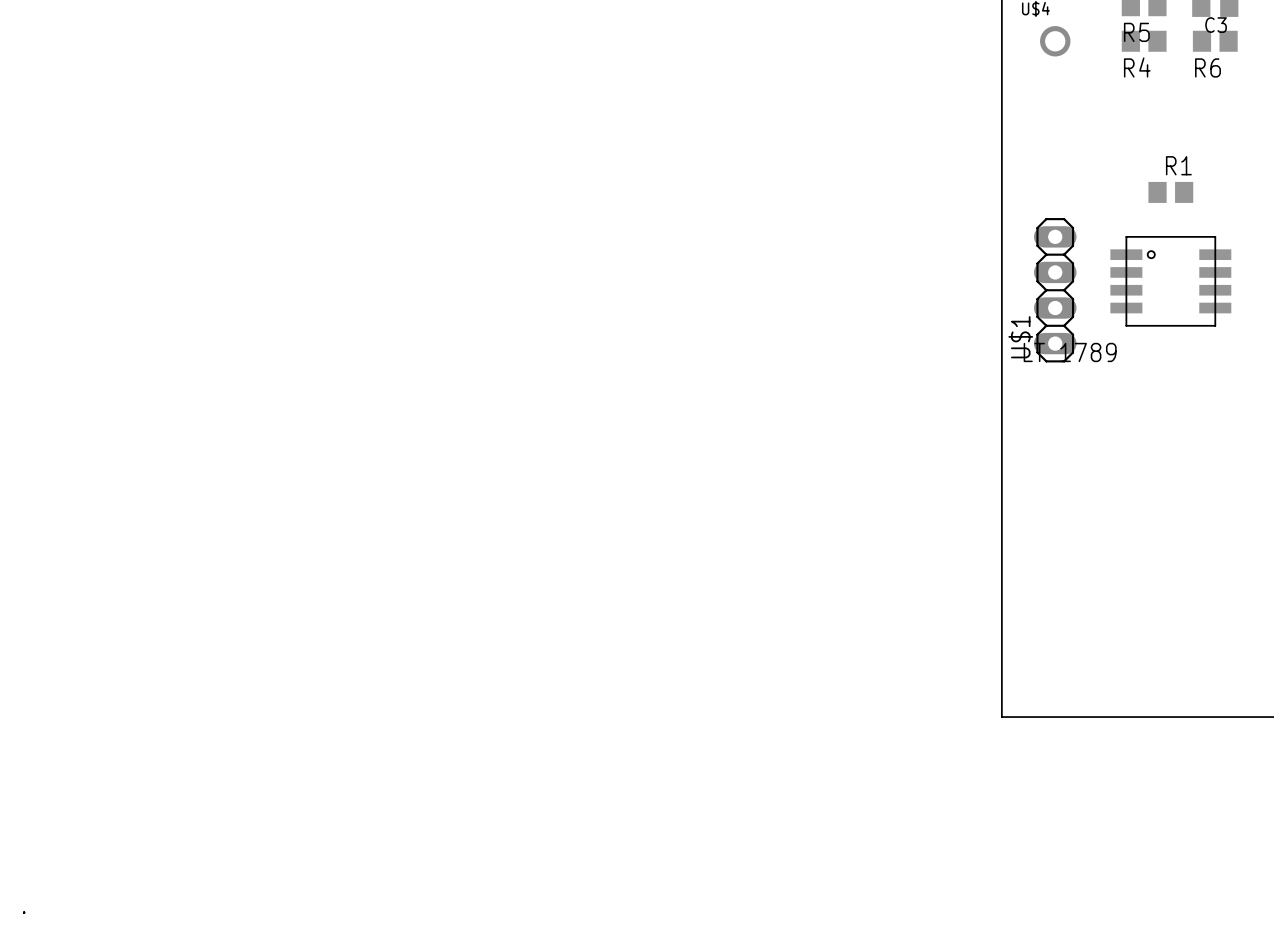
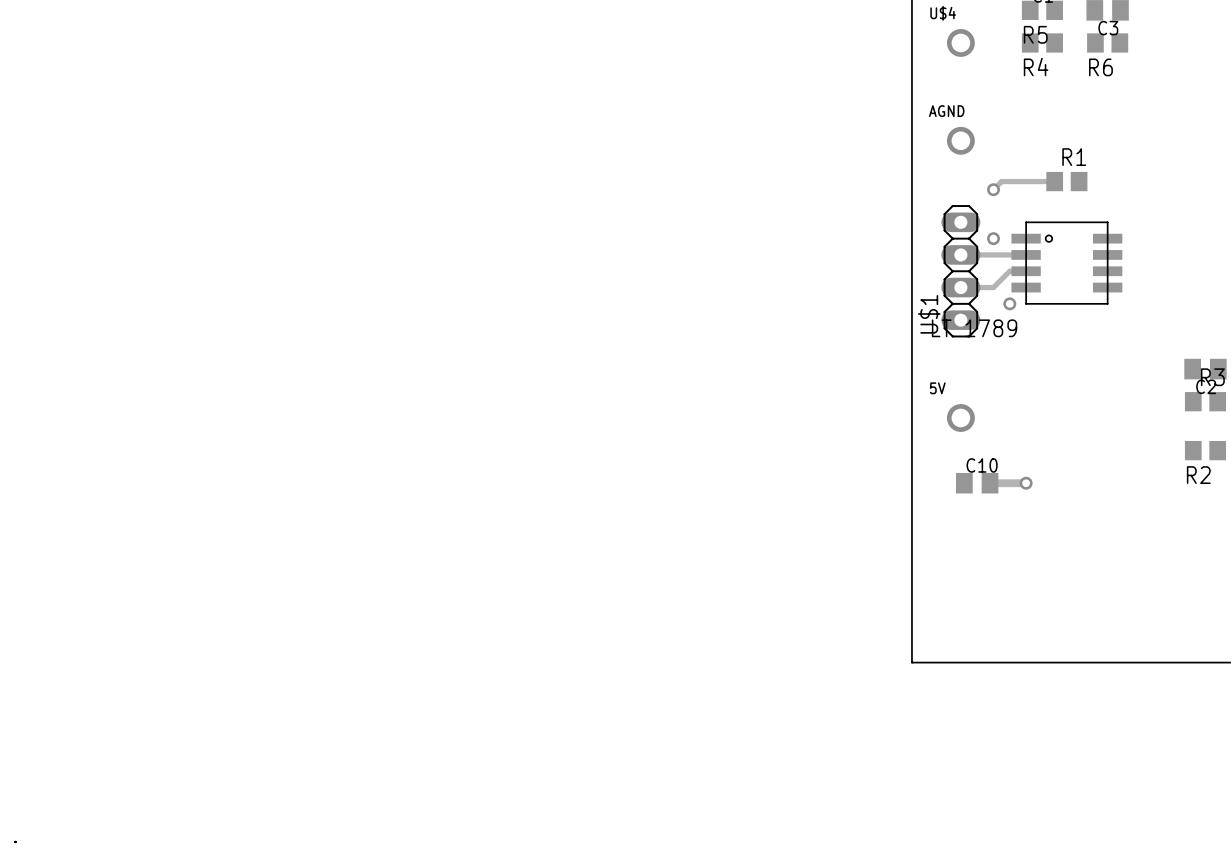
AGND: none -> (960, 140)
track: none -> (1054, 181) (1001, 181) (993, 189)
via: none -> (993, 189)
via: none -> (993, 238)
track: none -> (960, 254) (1026, 254)
track: none -> (1026, 271) (1009, 271) (993, 287) (960, 287)
via: none -> (1009, 303)
5V: none -> (960, 418)
C10: none -> (977, 483)
track: none -> (990, 483) (1026, 483)
via: none -> (1026, 483)

